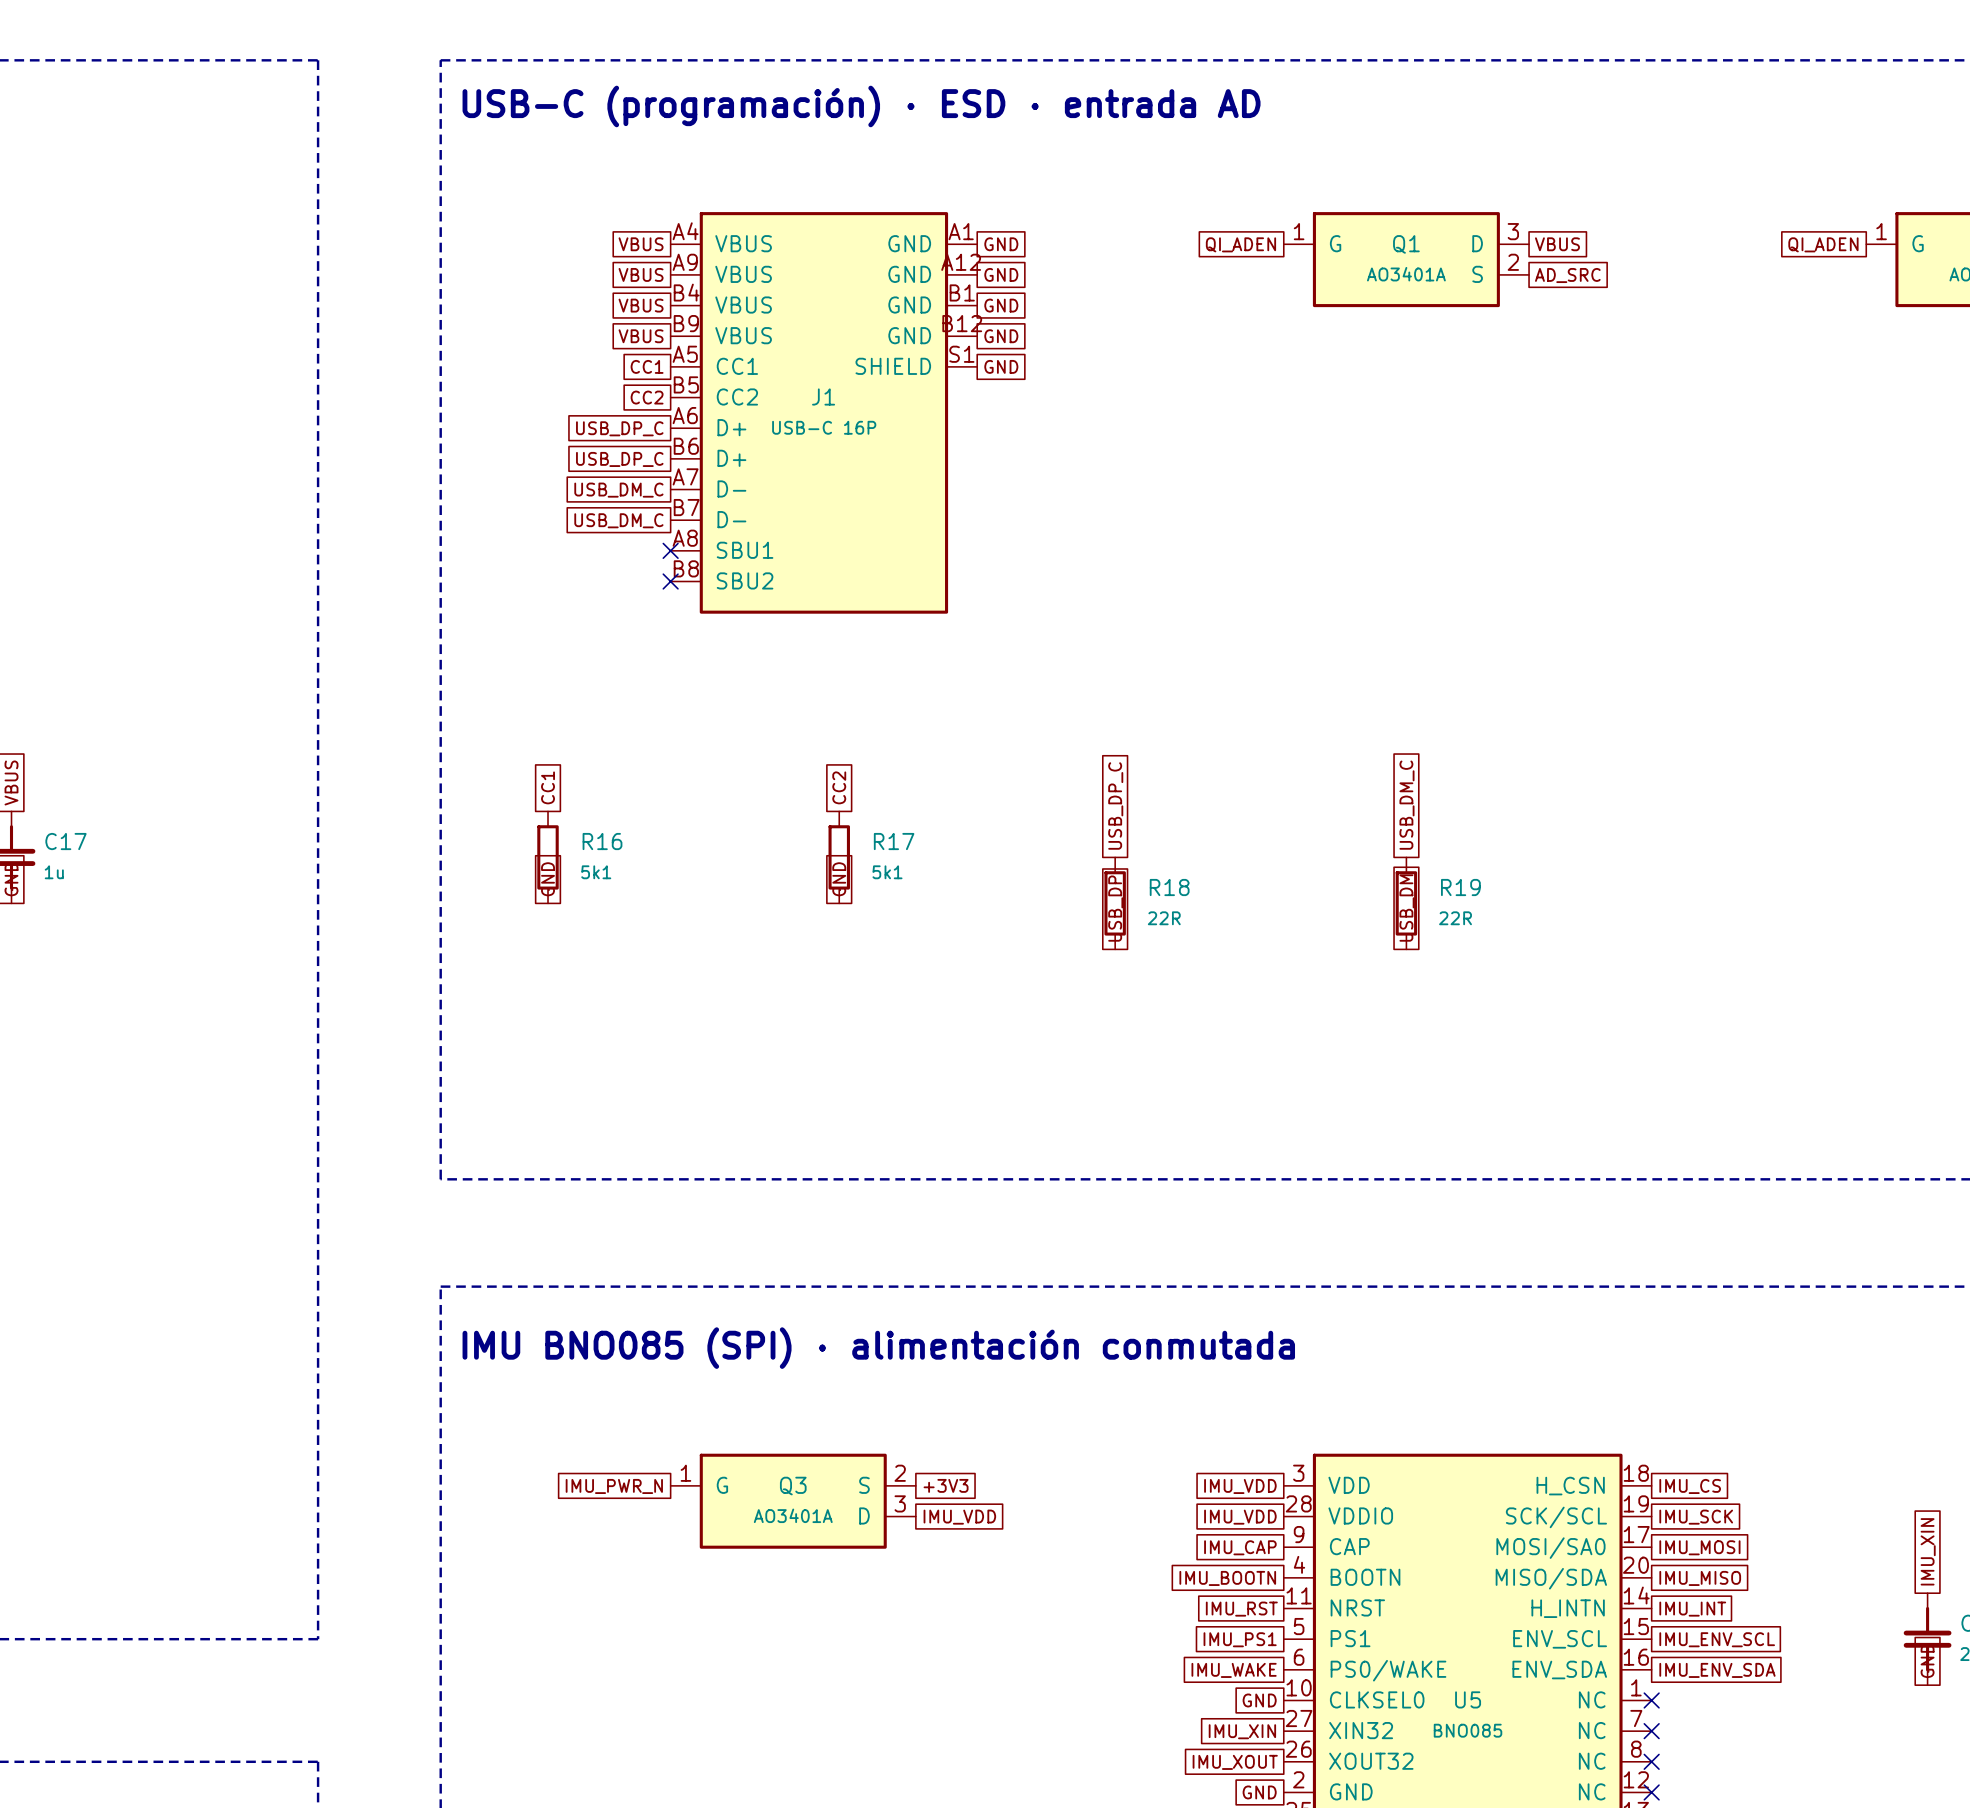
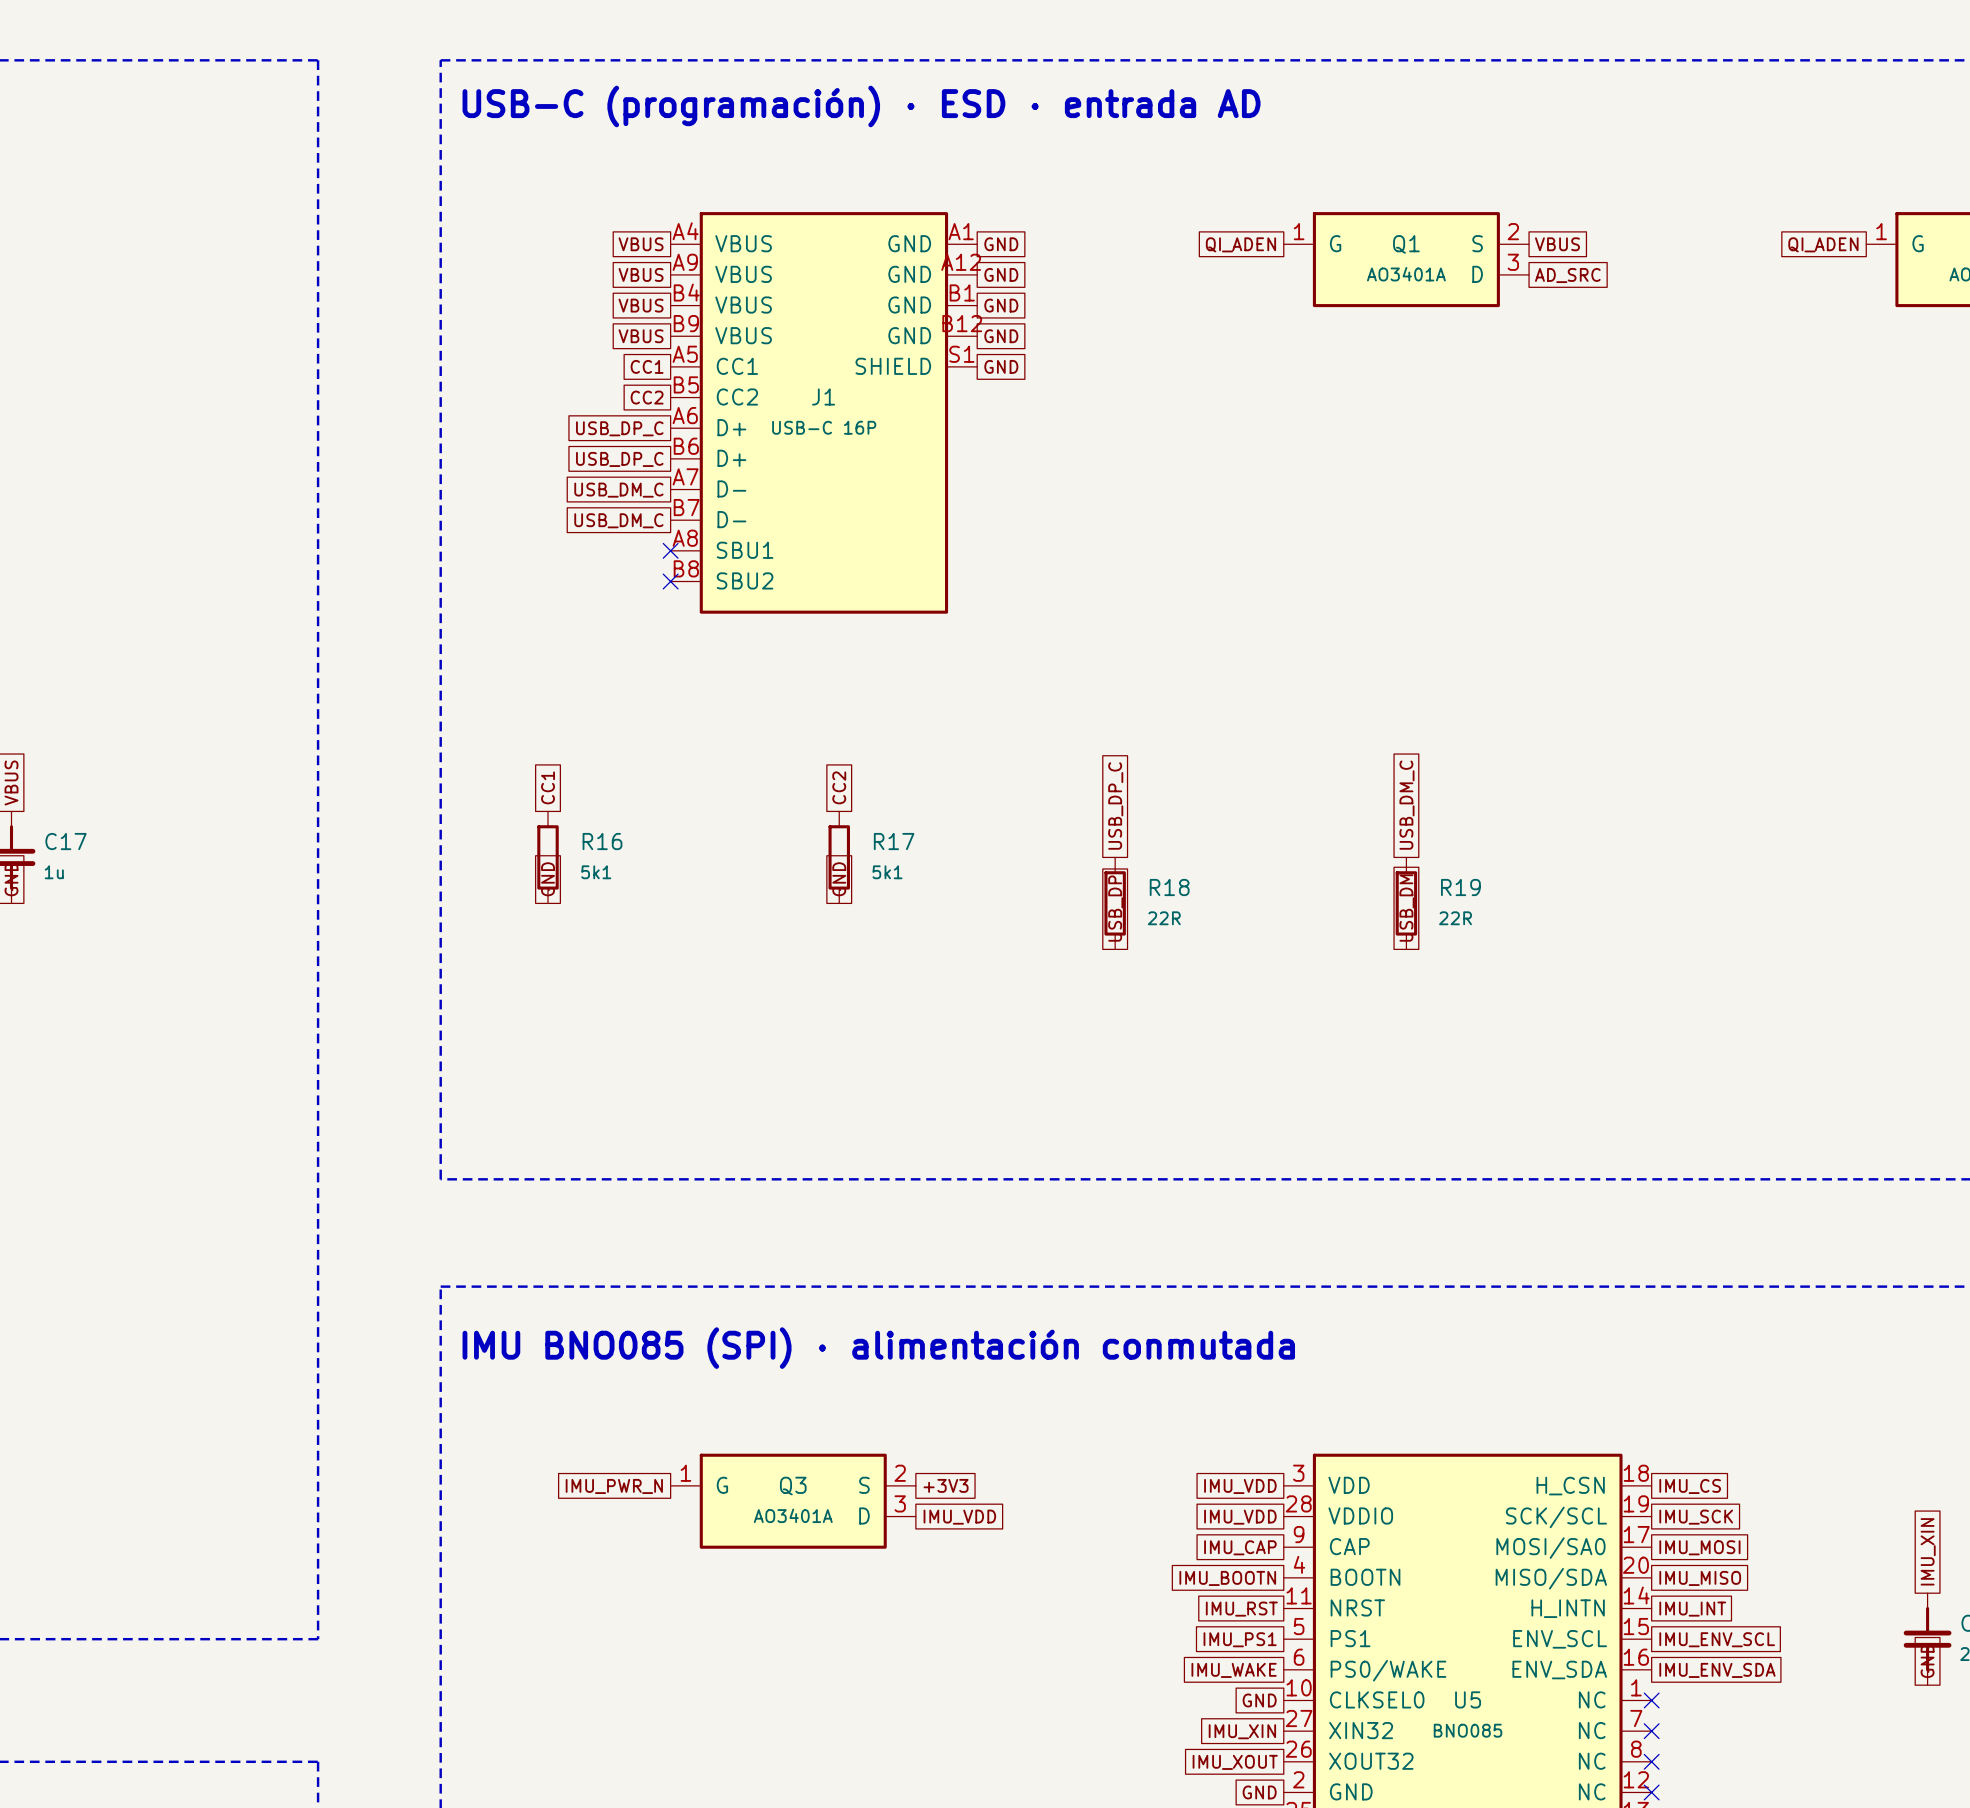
Q1 pin number: 3 (1513, 231) -> 2 (1513, 231)
Q1 pin name: D (1477, 243) -> S (1477, 243)
Q1 pin number: 2 (1513, 262) -> 3 (1513, 262)
Q1 pin name: S (1477, 274) -> D (1477, 274)

